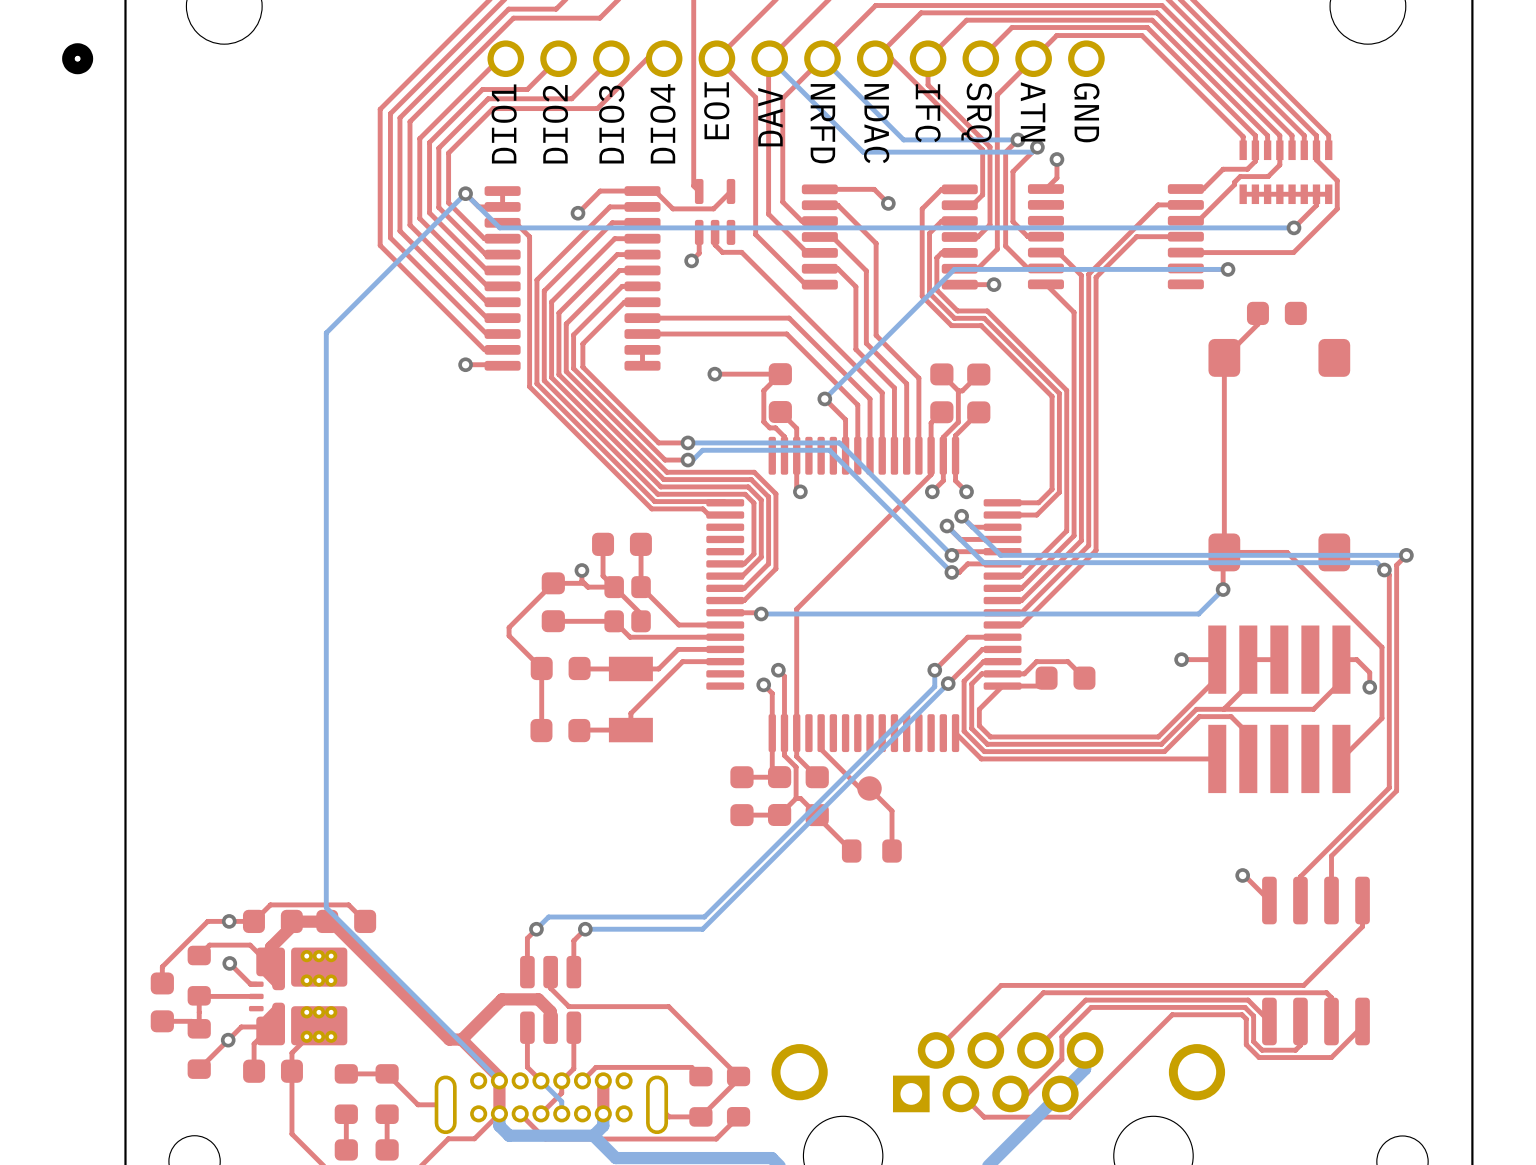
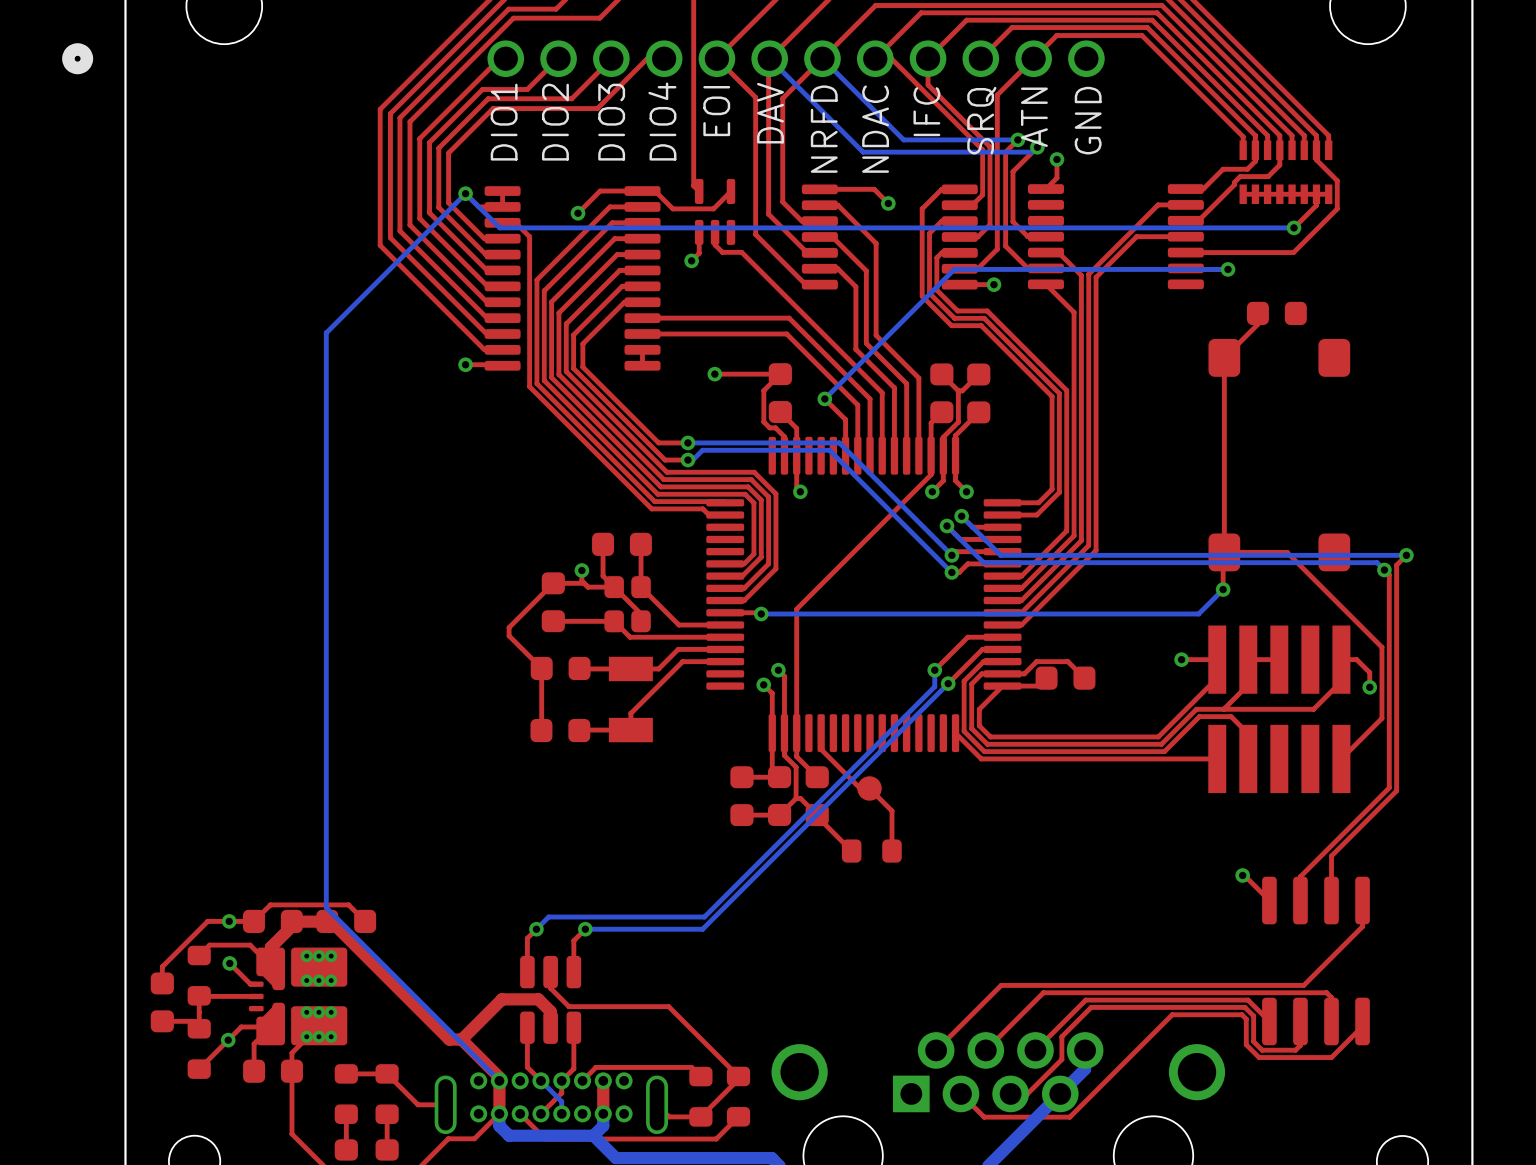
text rotation: 0° (1033, 111) -> 180° (1034, 117)
text rotation: 0° (976, 112) -> 180° (981, 120)
text rotation: 0° (1086, 112) -> 180° (1088, 120)
text rotation: 0° (927, 113) -> 180° (926, 111)
text rotation: 0° (822, 123) -> 180° (824, 129)
text rotation: 0° (876, 123) -> 180° (875, 129)

